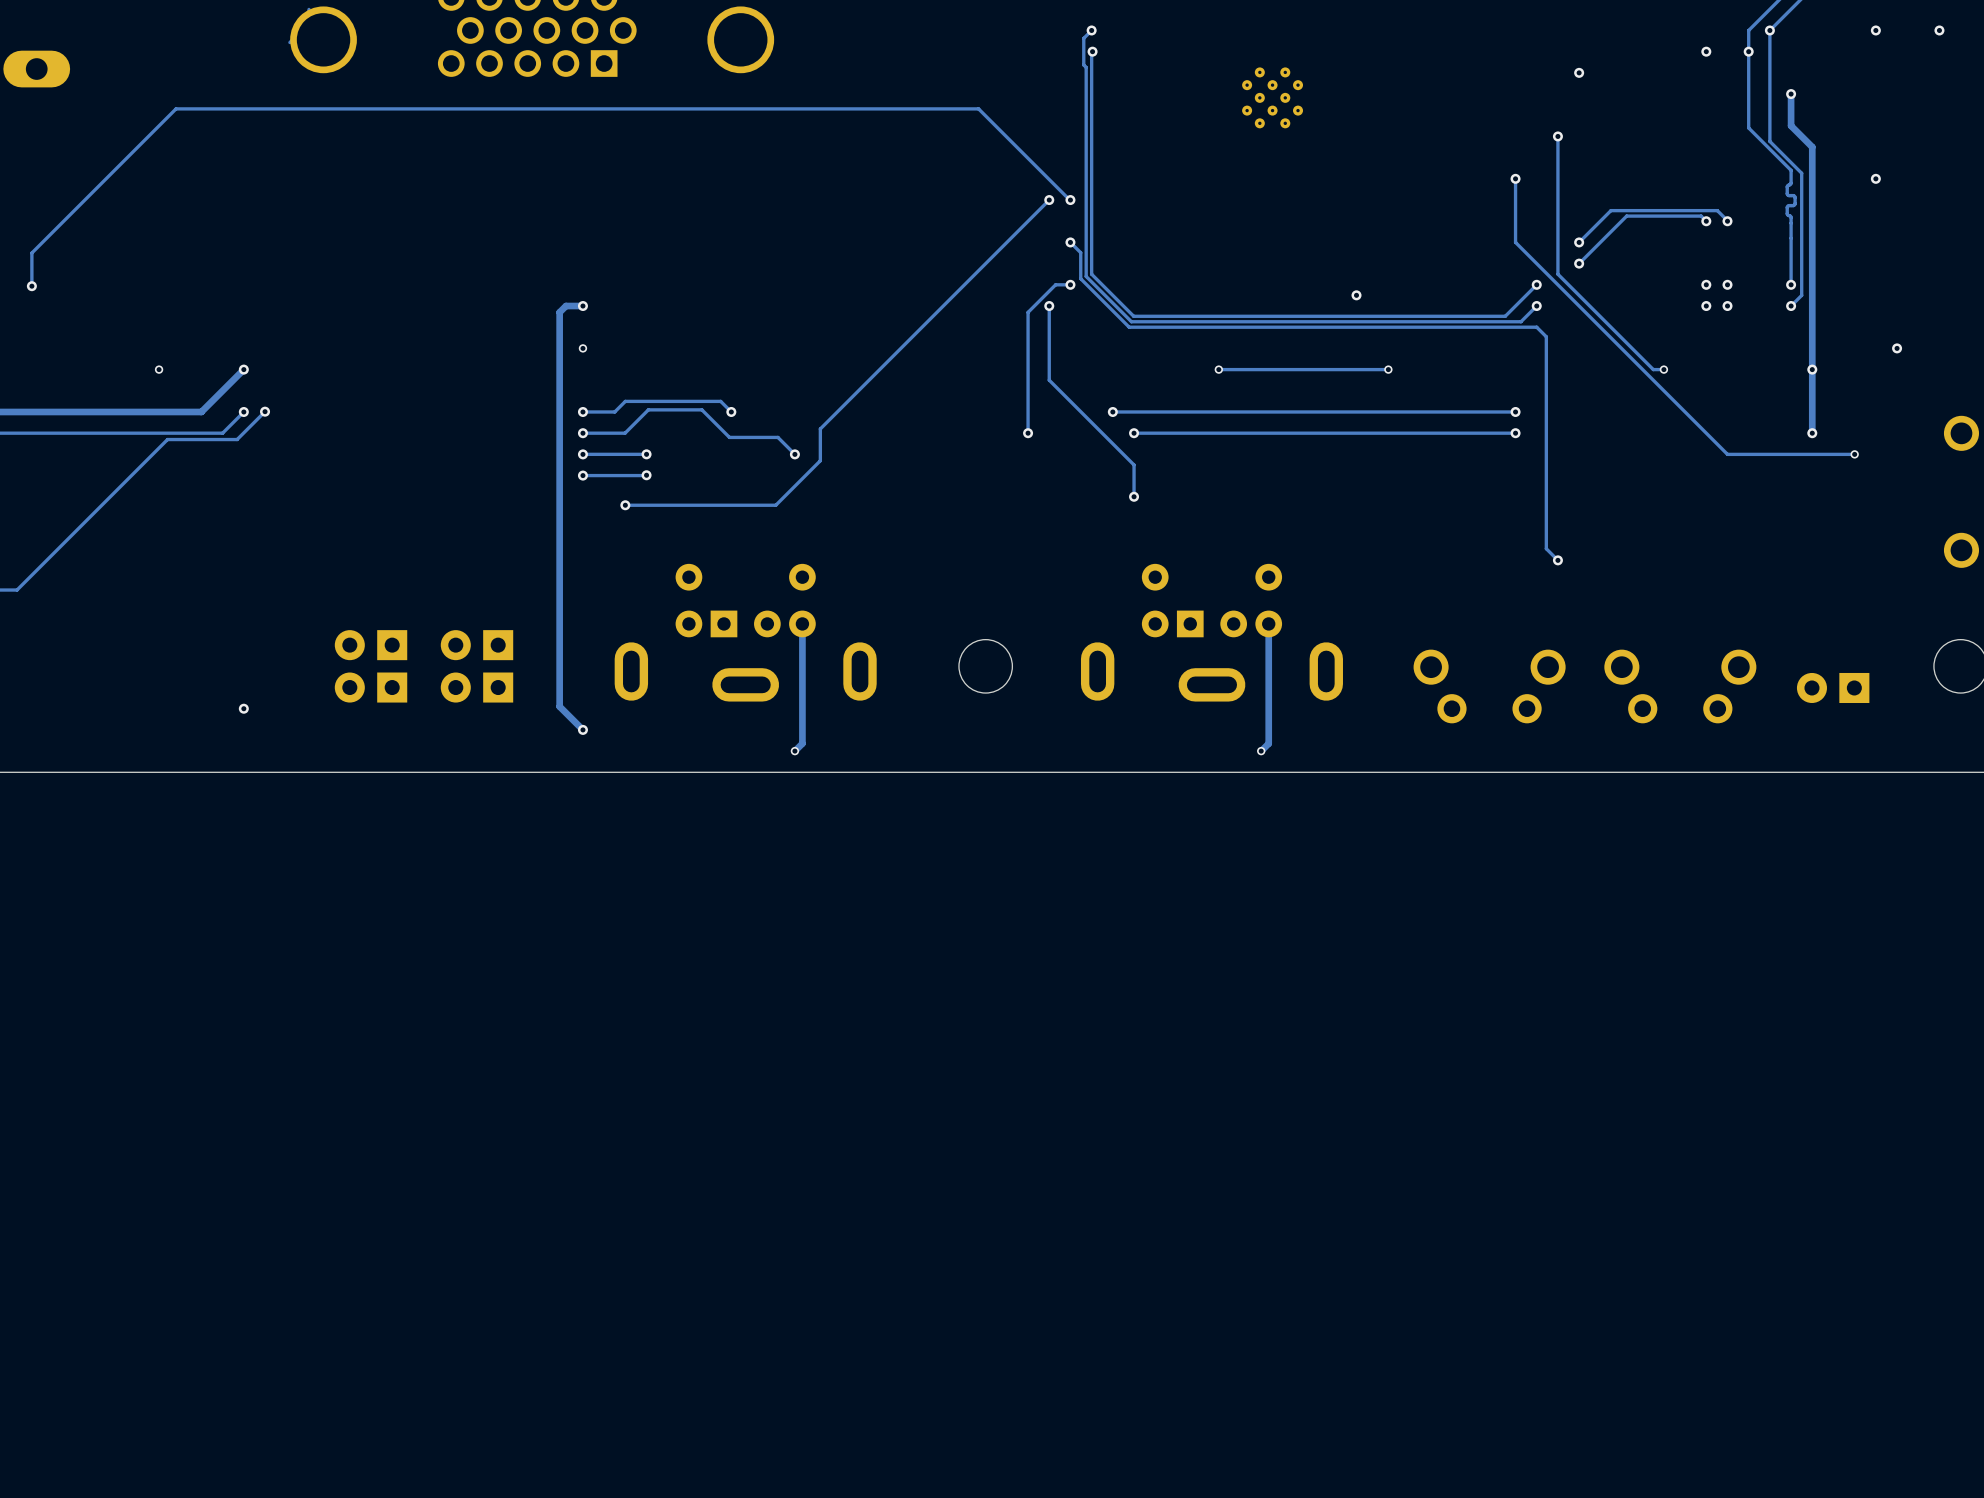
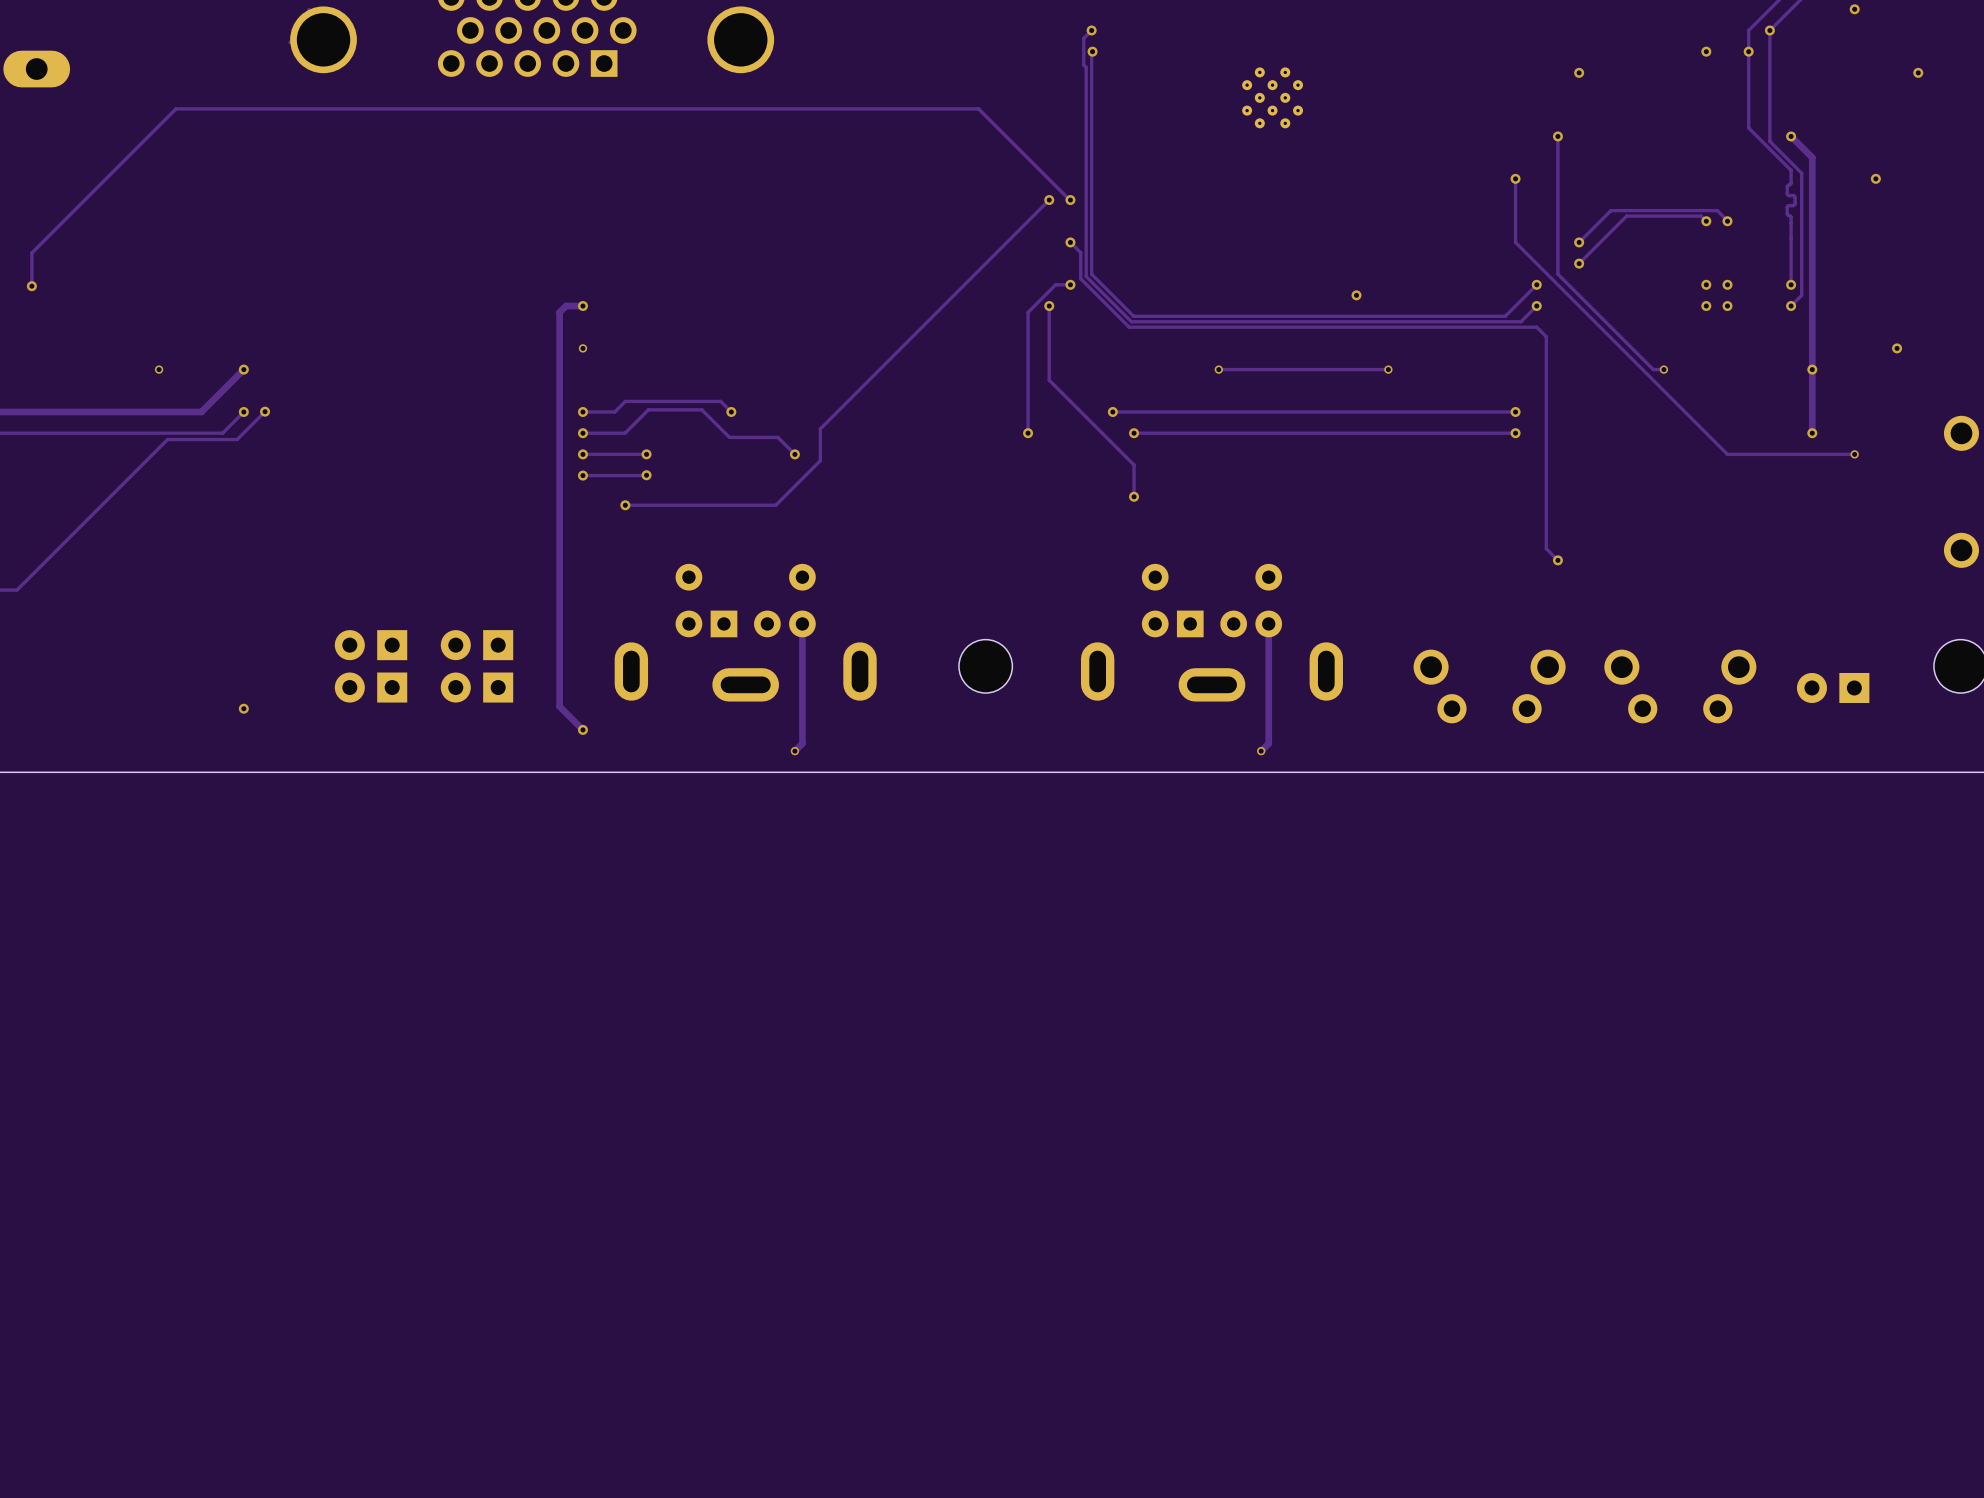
via: none -> (1854, 9)
via: (1875, 30) -> none
via: (1939, 30) -> none
via: none -> (1918, 72)
track: (1791, 94) (1791, 125) (1812, 147) (1812, 157) -> (1791, 136) (1812, 157)
via position: (1791, 94) -> (1791, 136)

